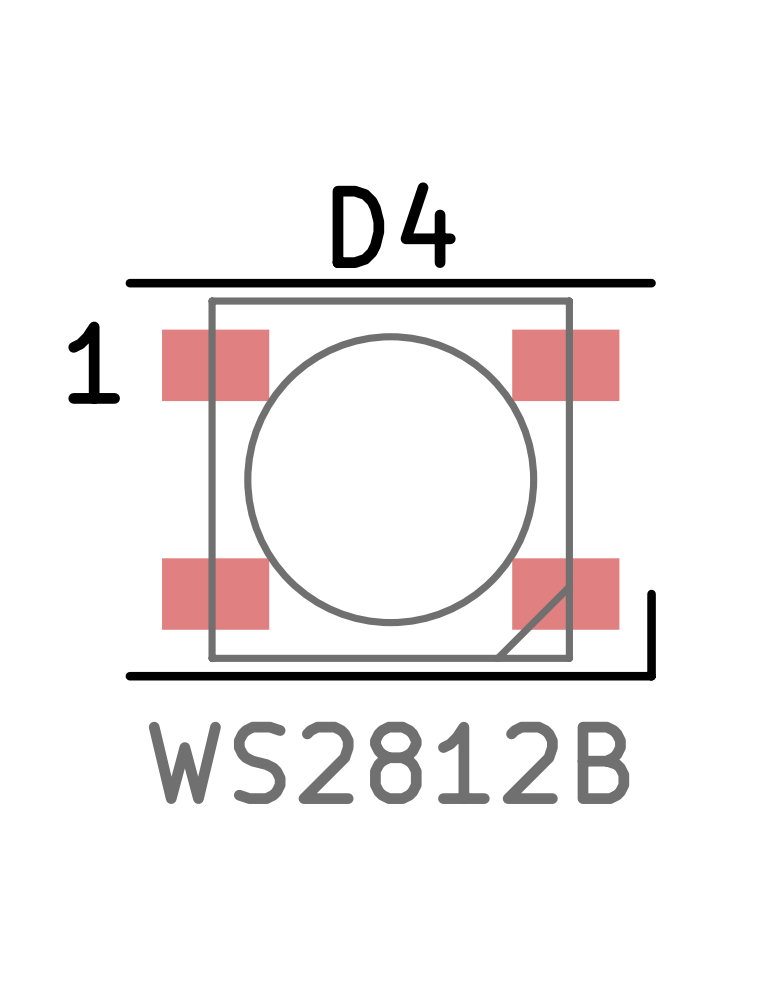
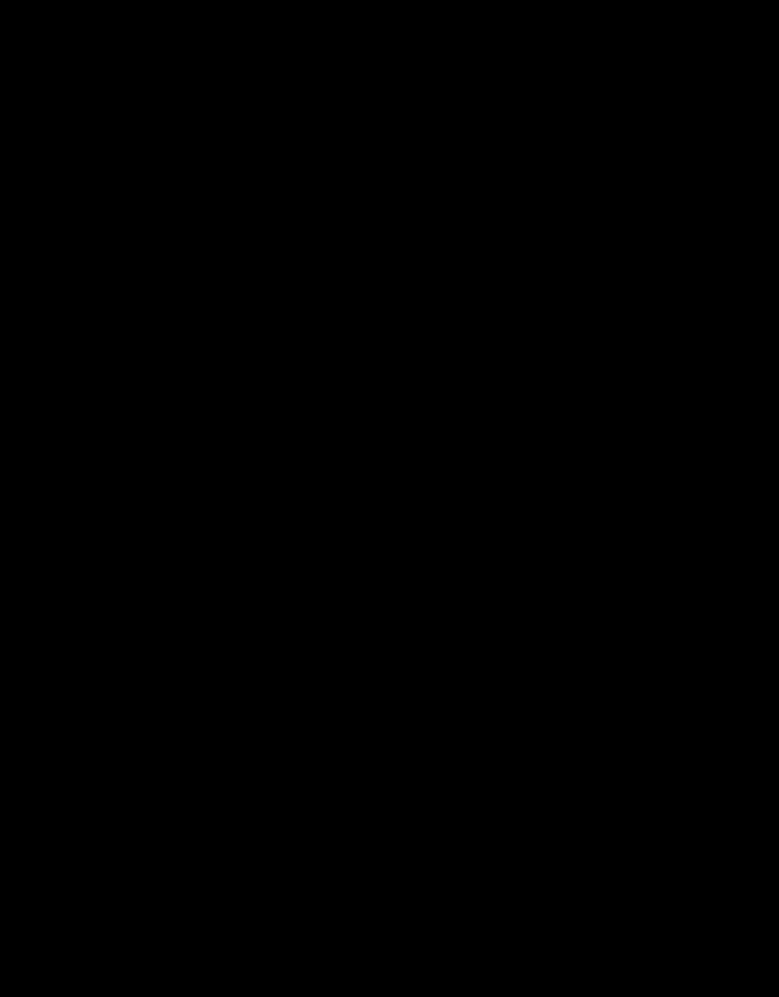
D4: WS2812B (390, 479) -> none

